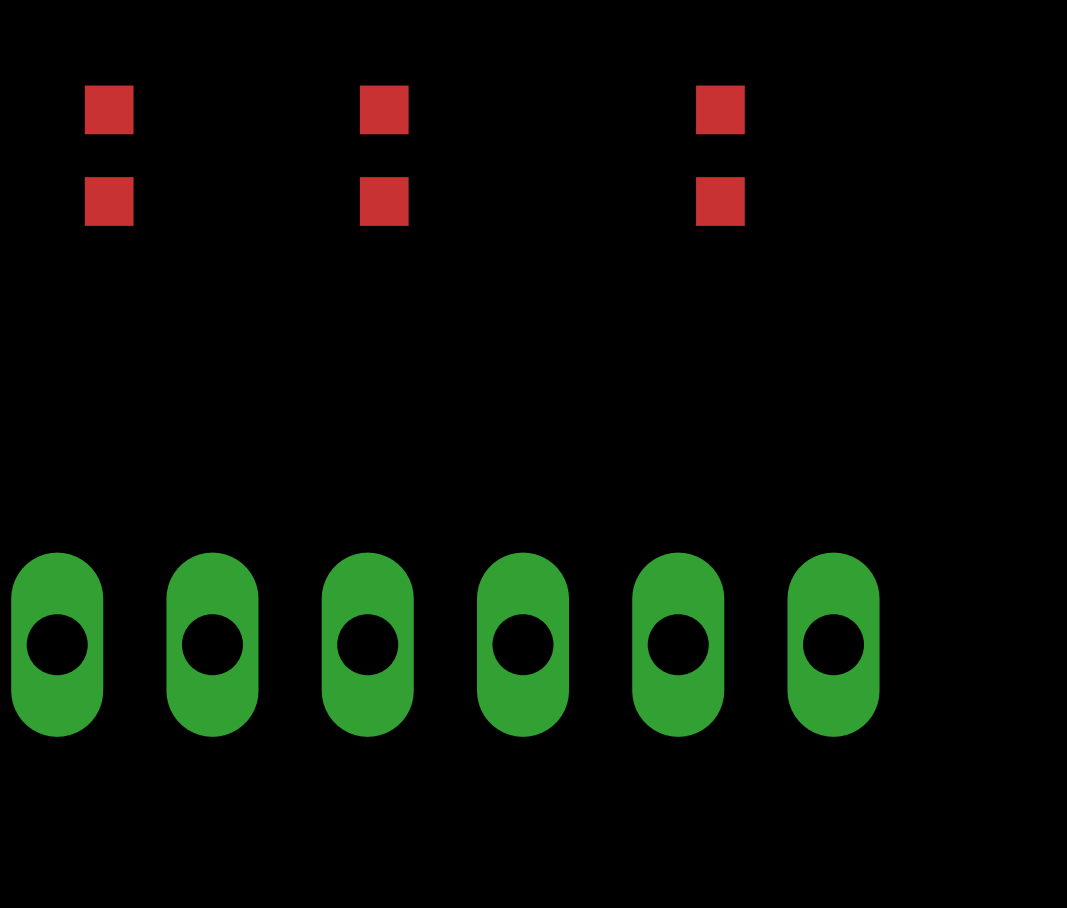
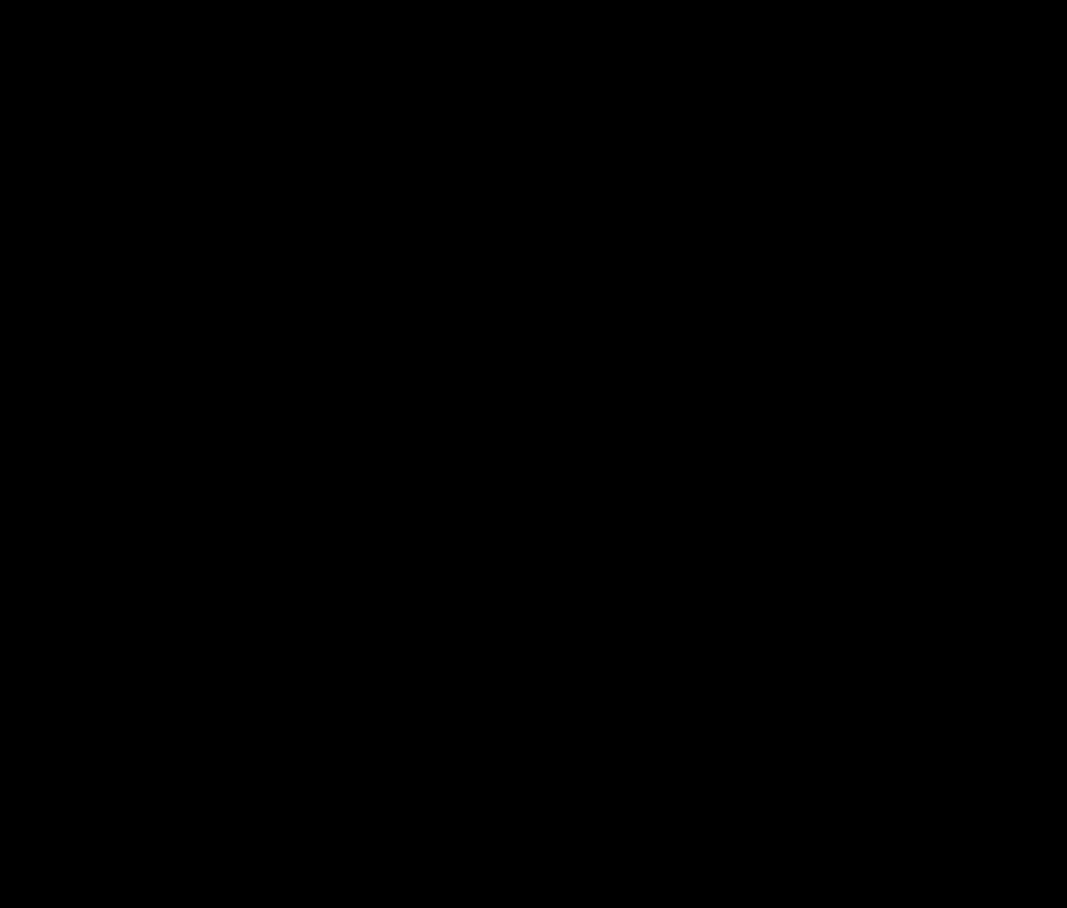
part: (109, 155) -> none
part: (384, 155) -> none
part: (720, 155) -> none
part: (445, 644) -> none

